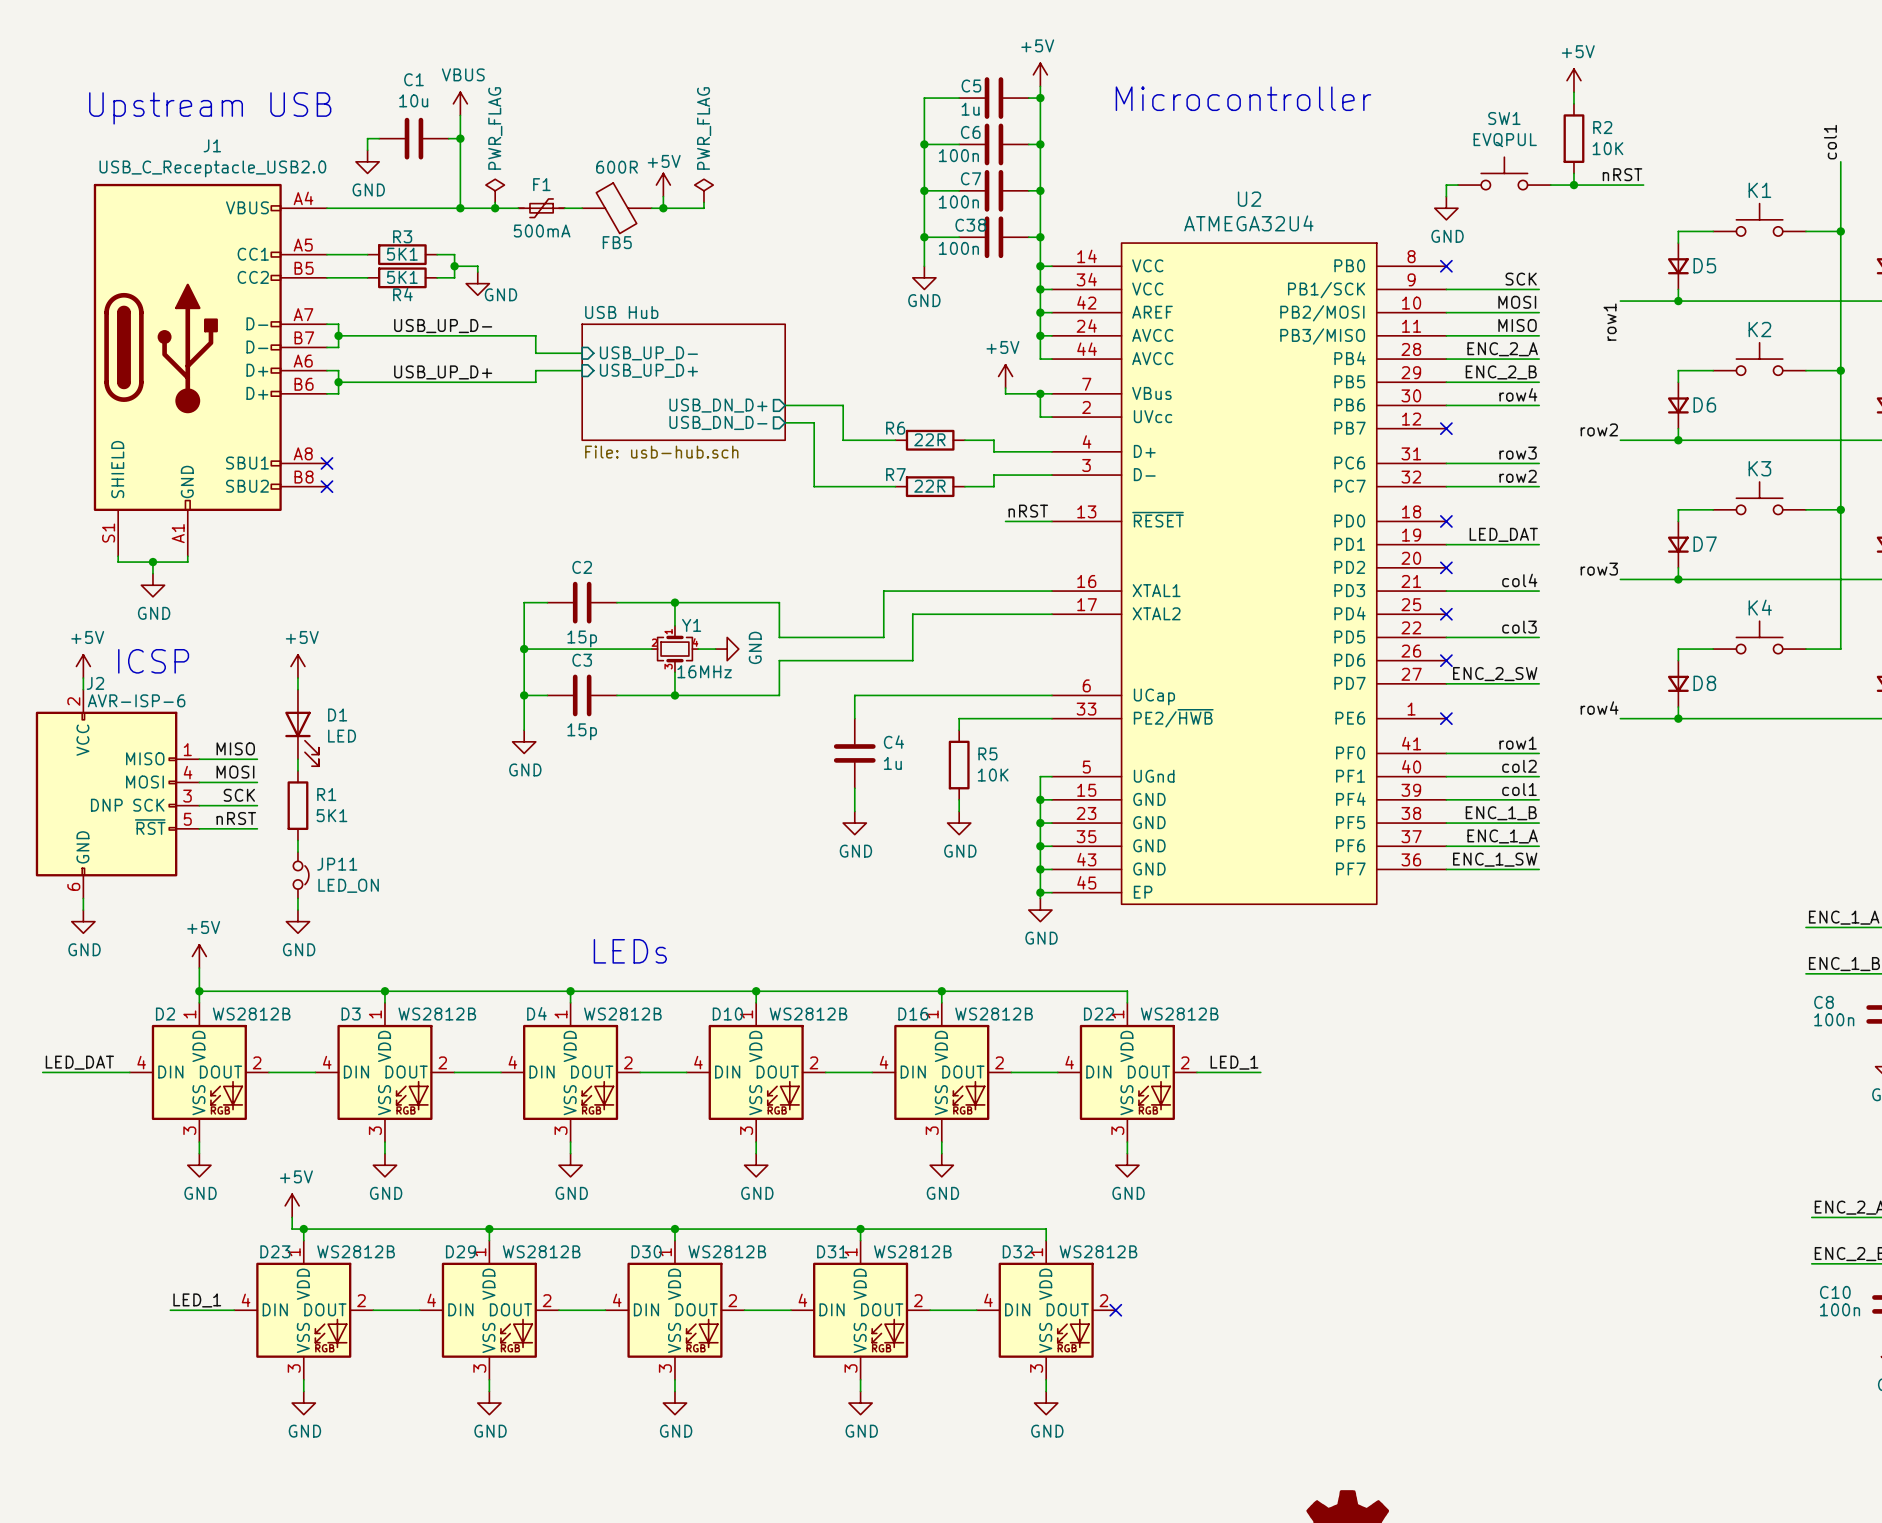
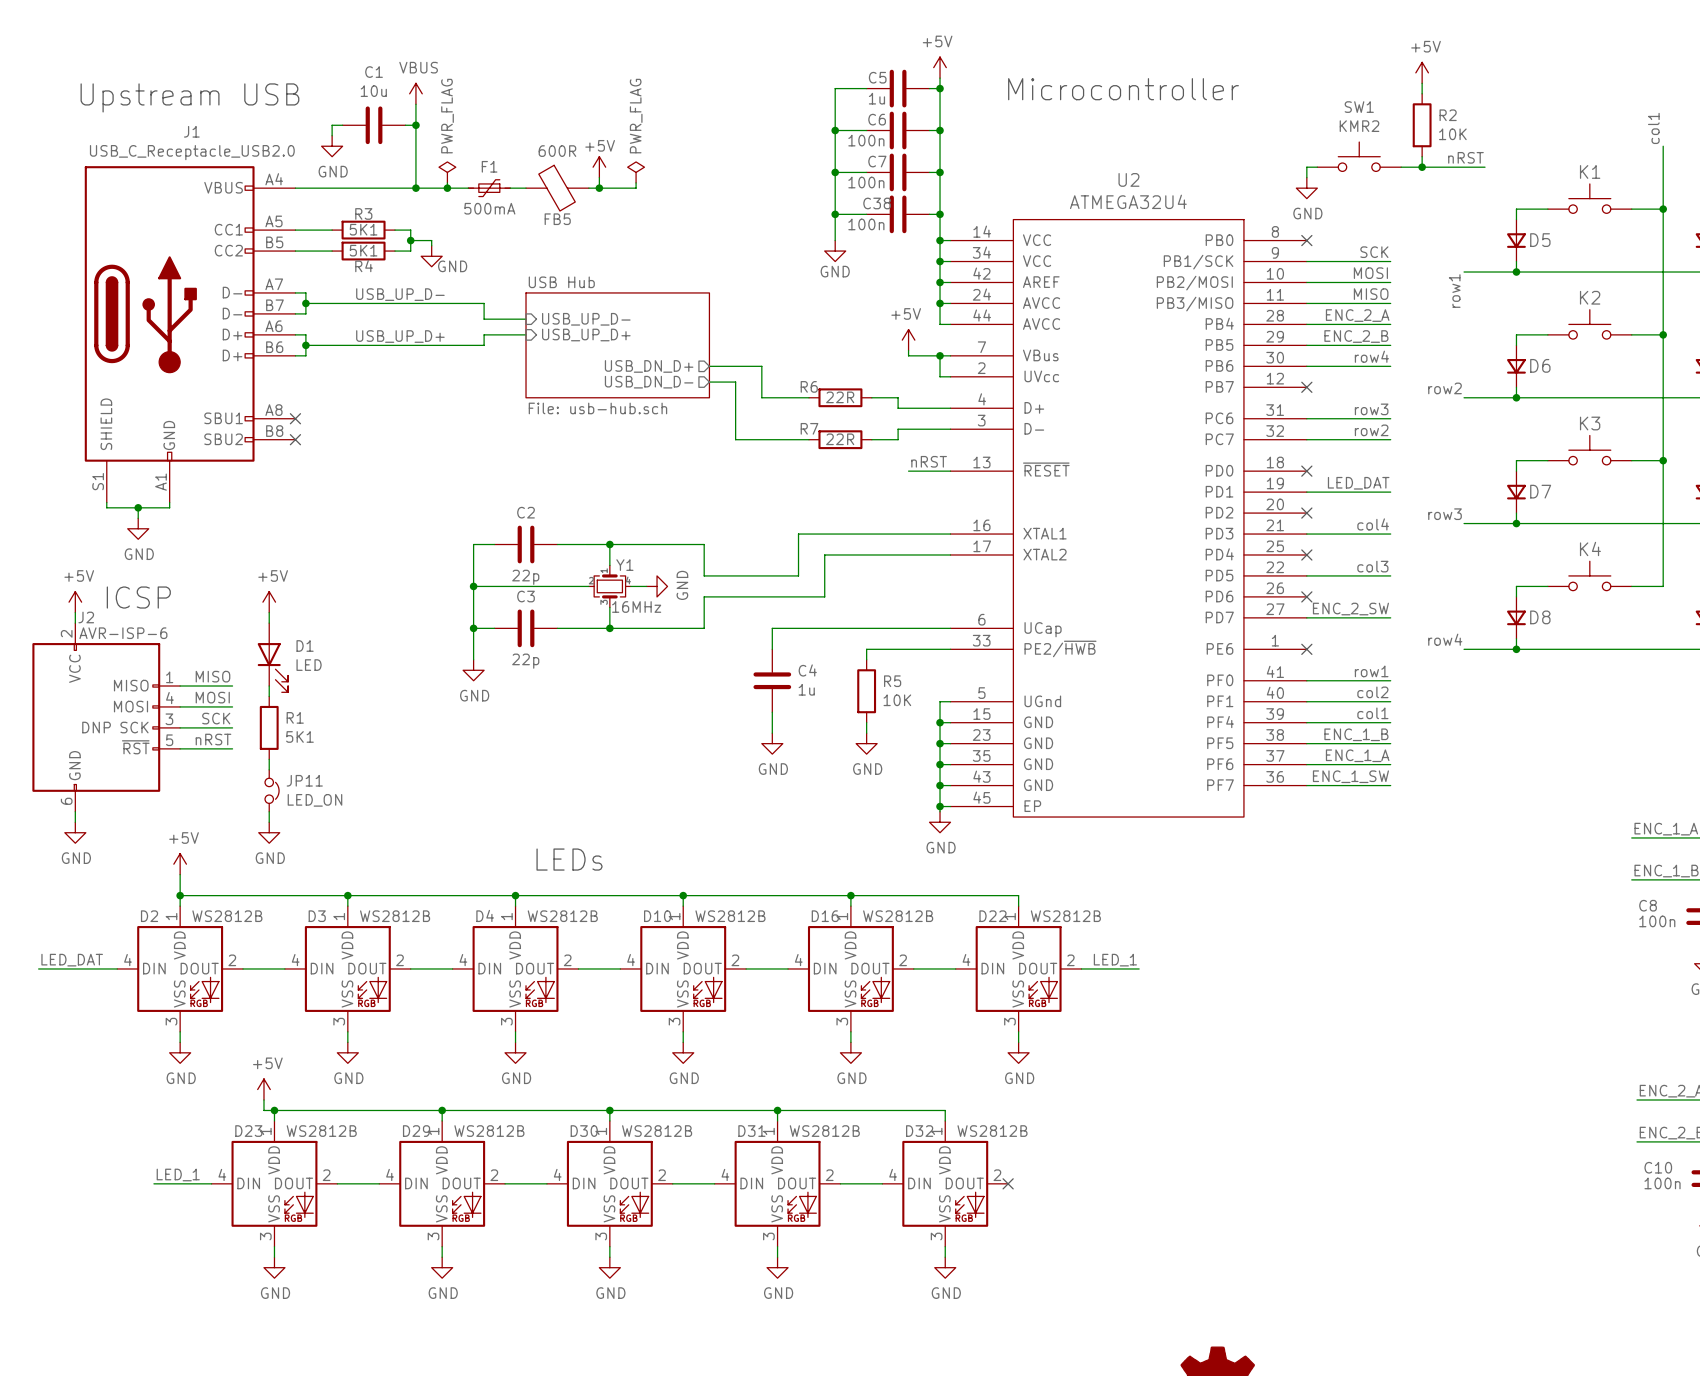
SW1 value: EVQPUL (1505, 140) -> KMR2 (1359, 126)
C2 value: 15p (582, 638) -> 22p (525, 577)
C3 value: 15p (582, 731) -> 22p (525, 661)

